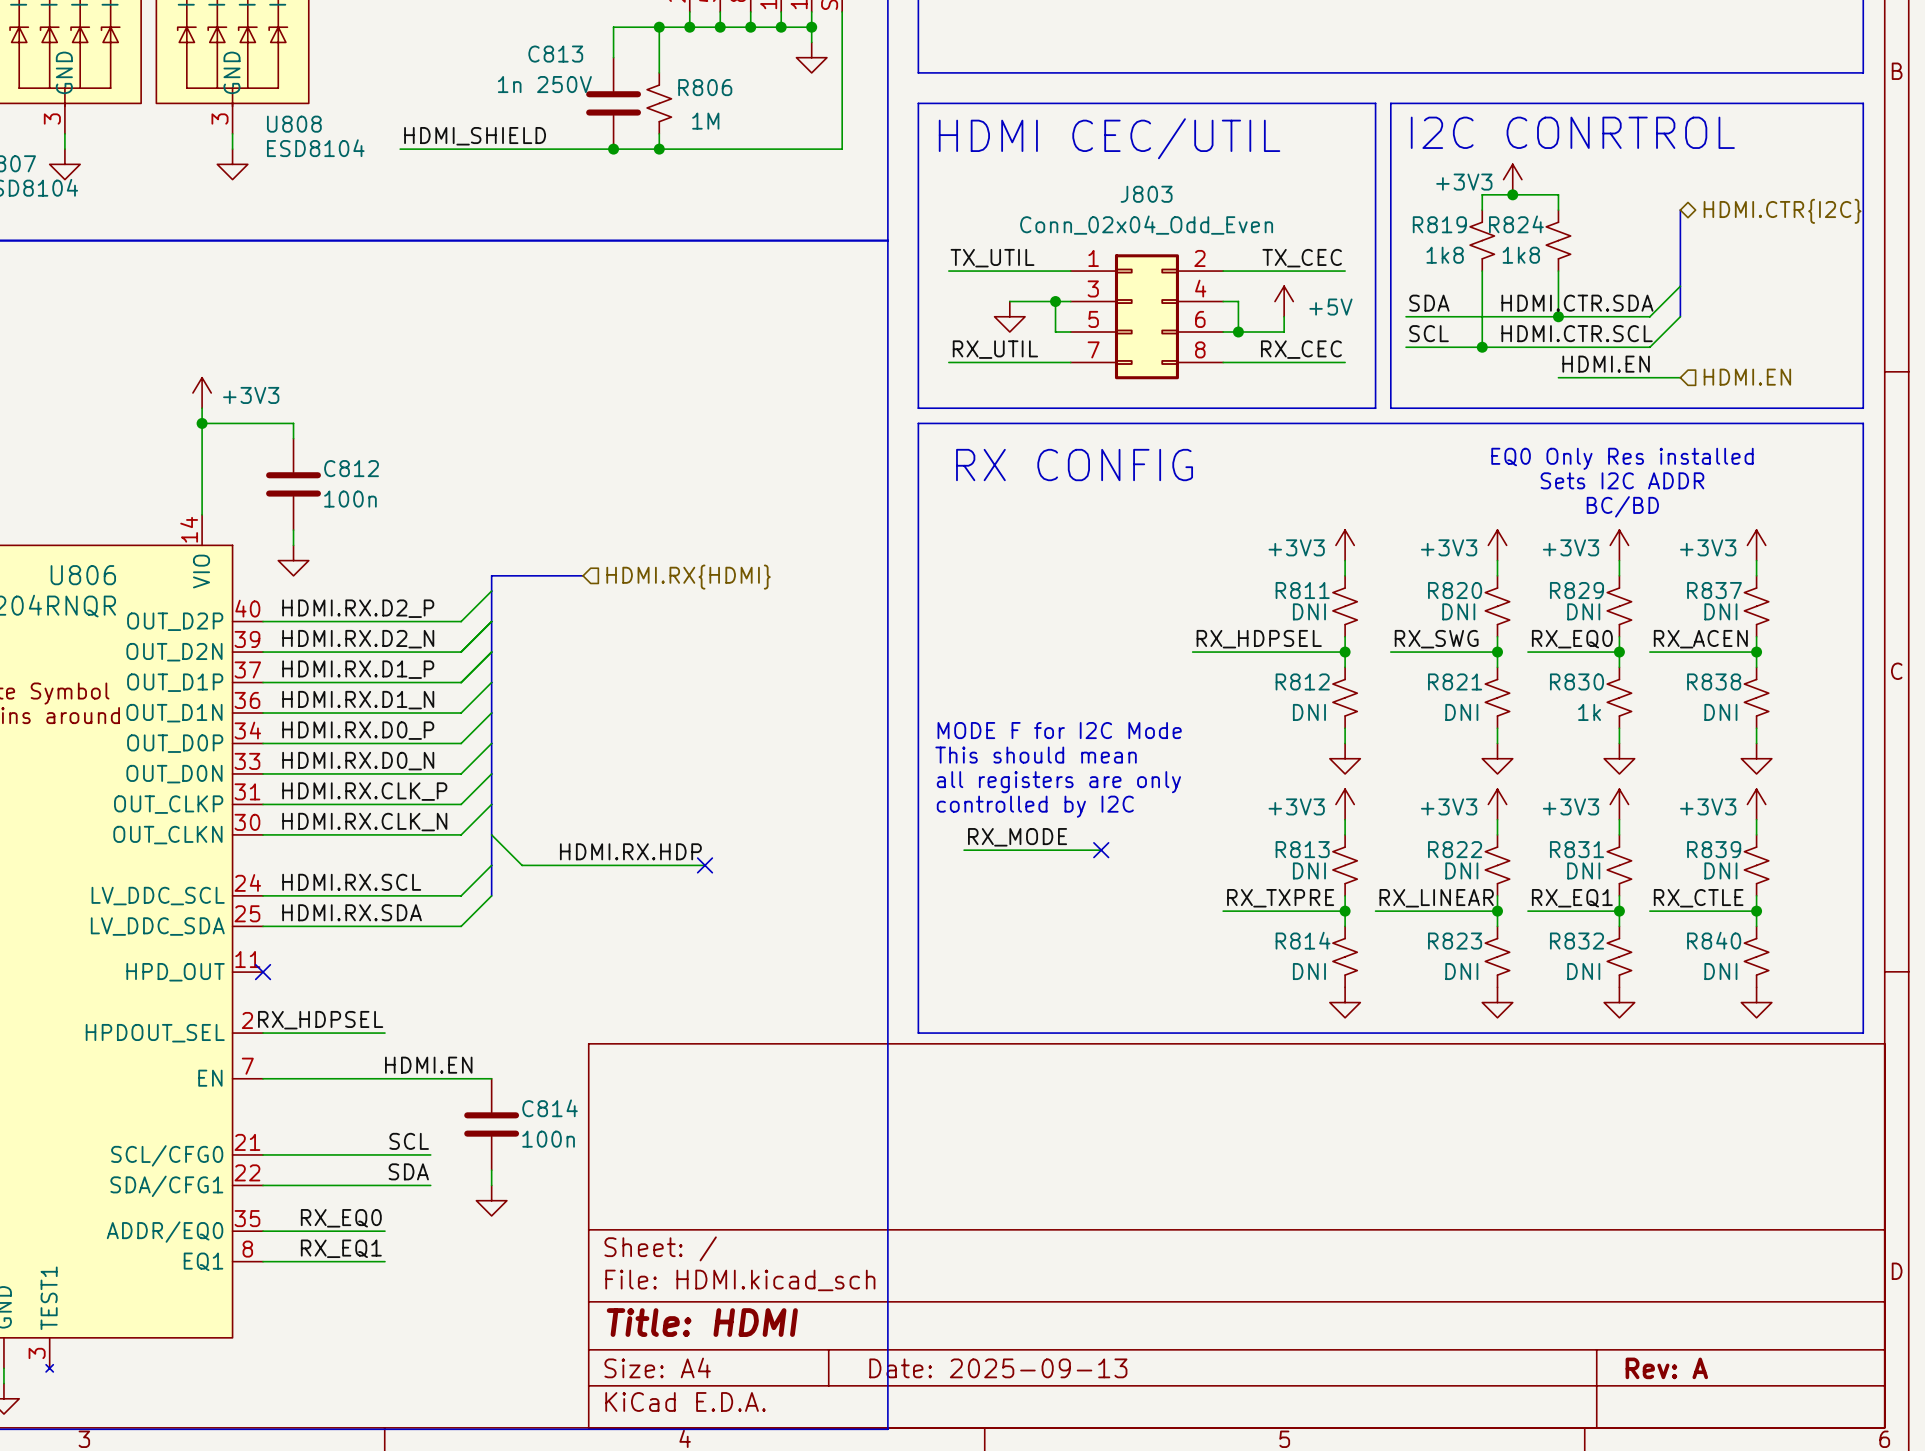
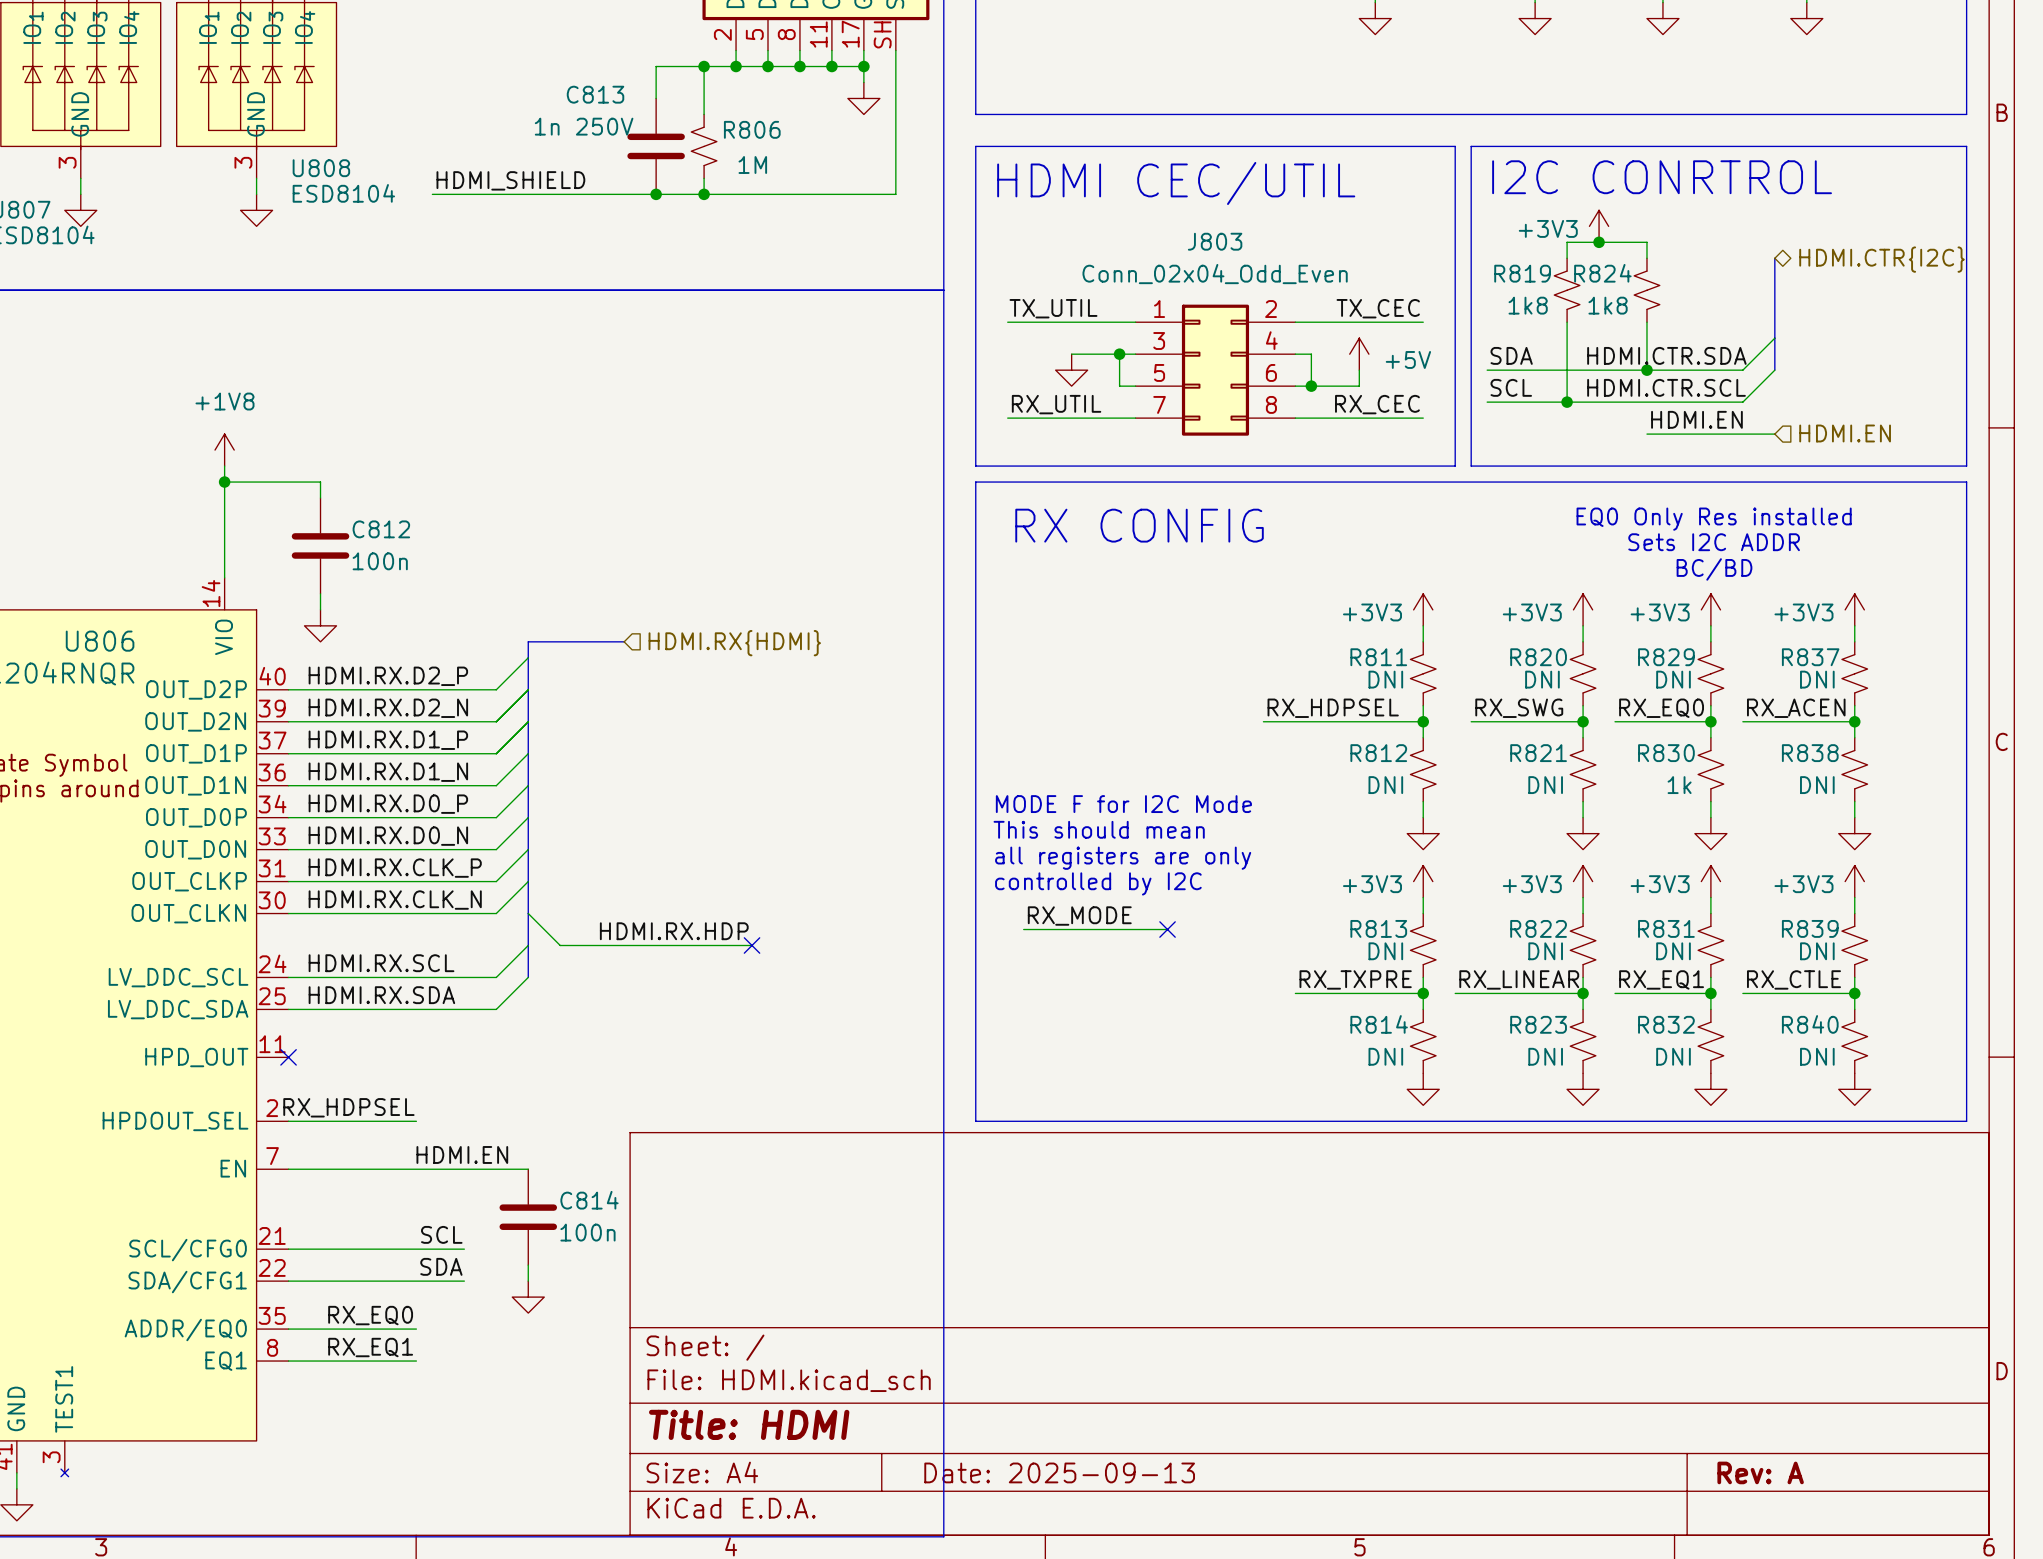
power symbol: +3V3 (202, 392) -> +1V8 (224, 450)

